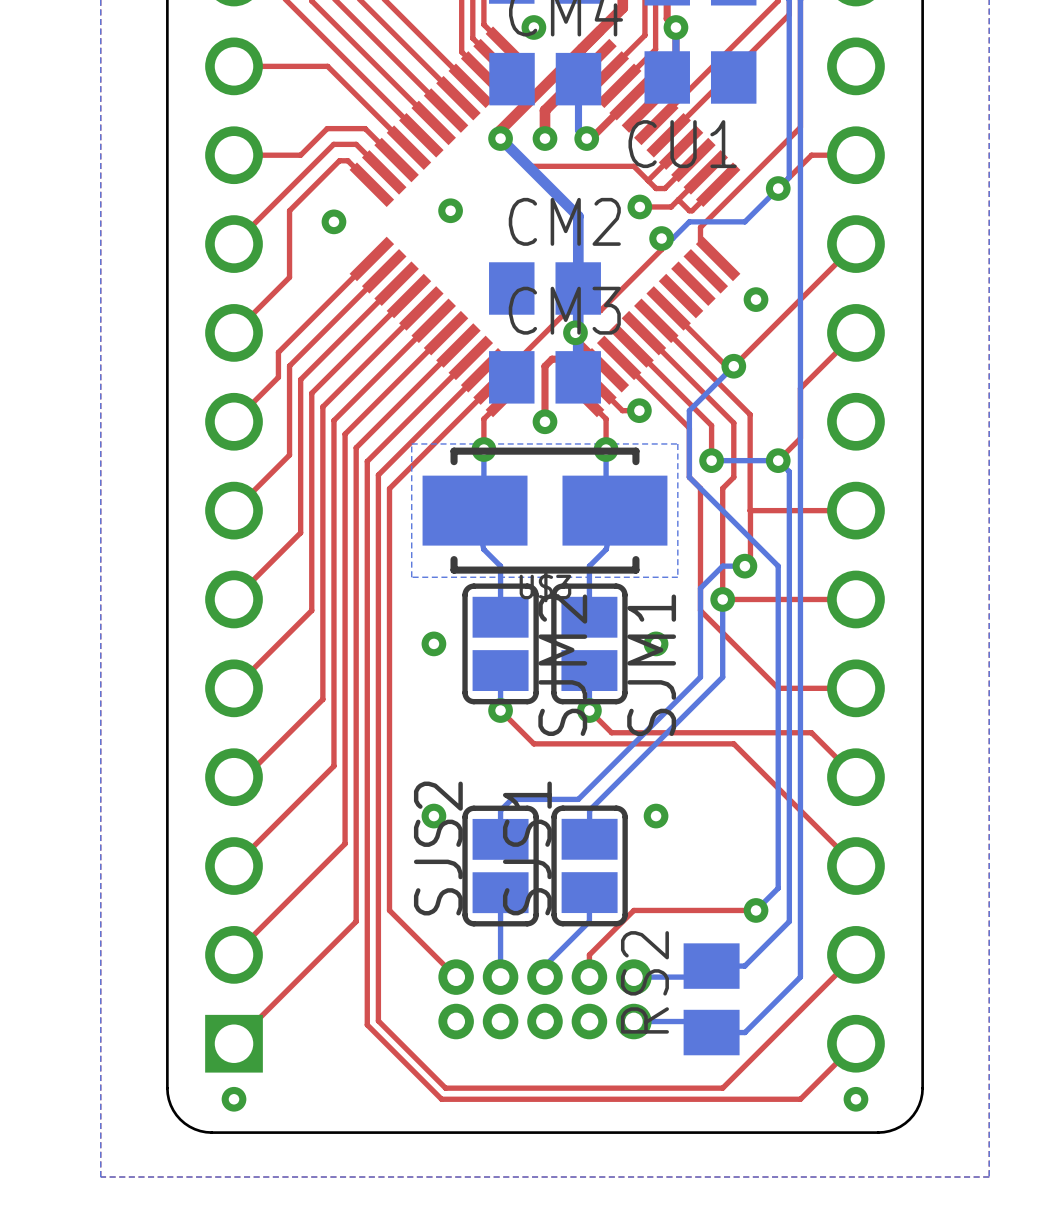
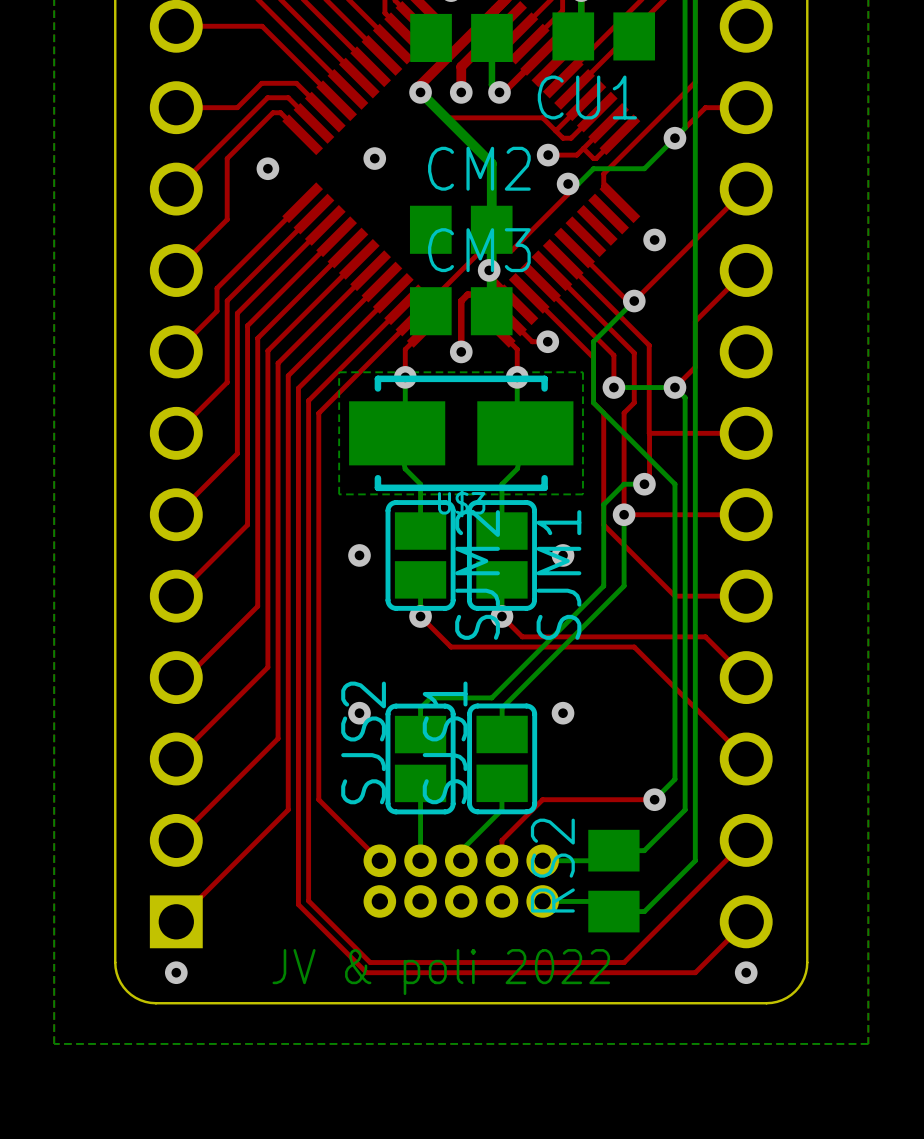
text: none -> JV & poli 2022 (441, 972)

